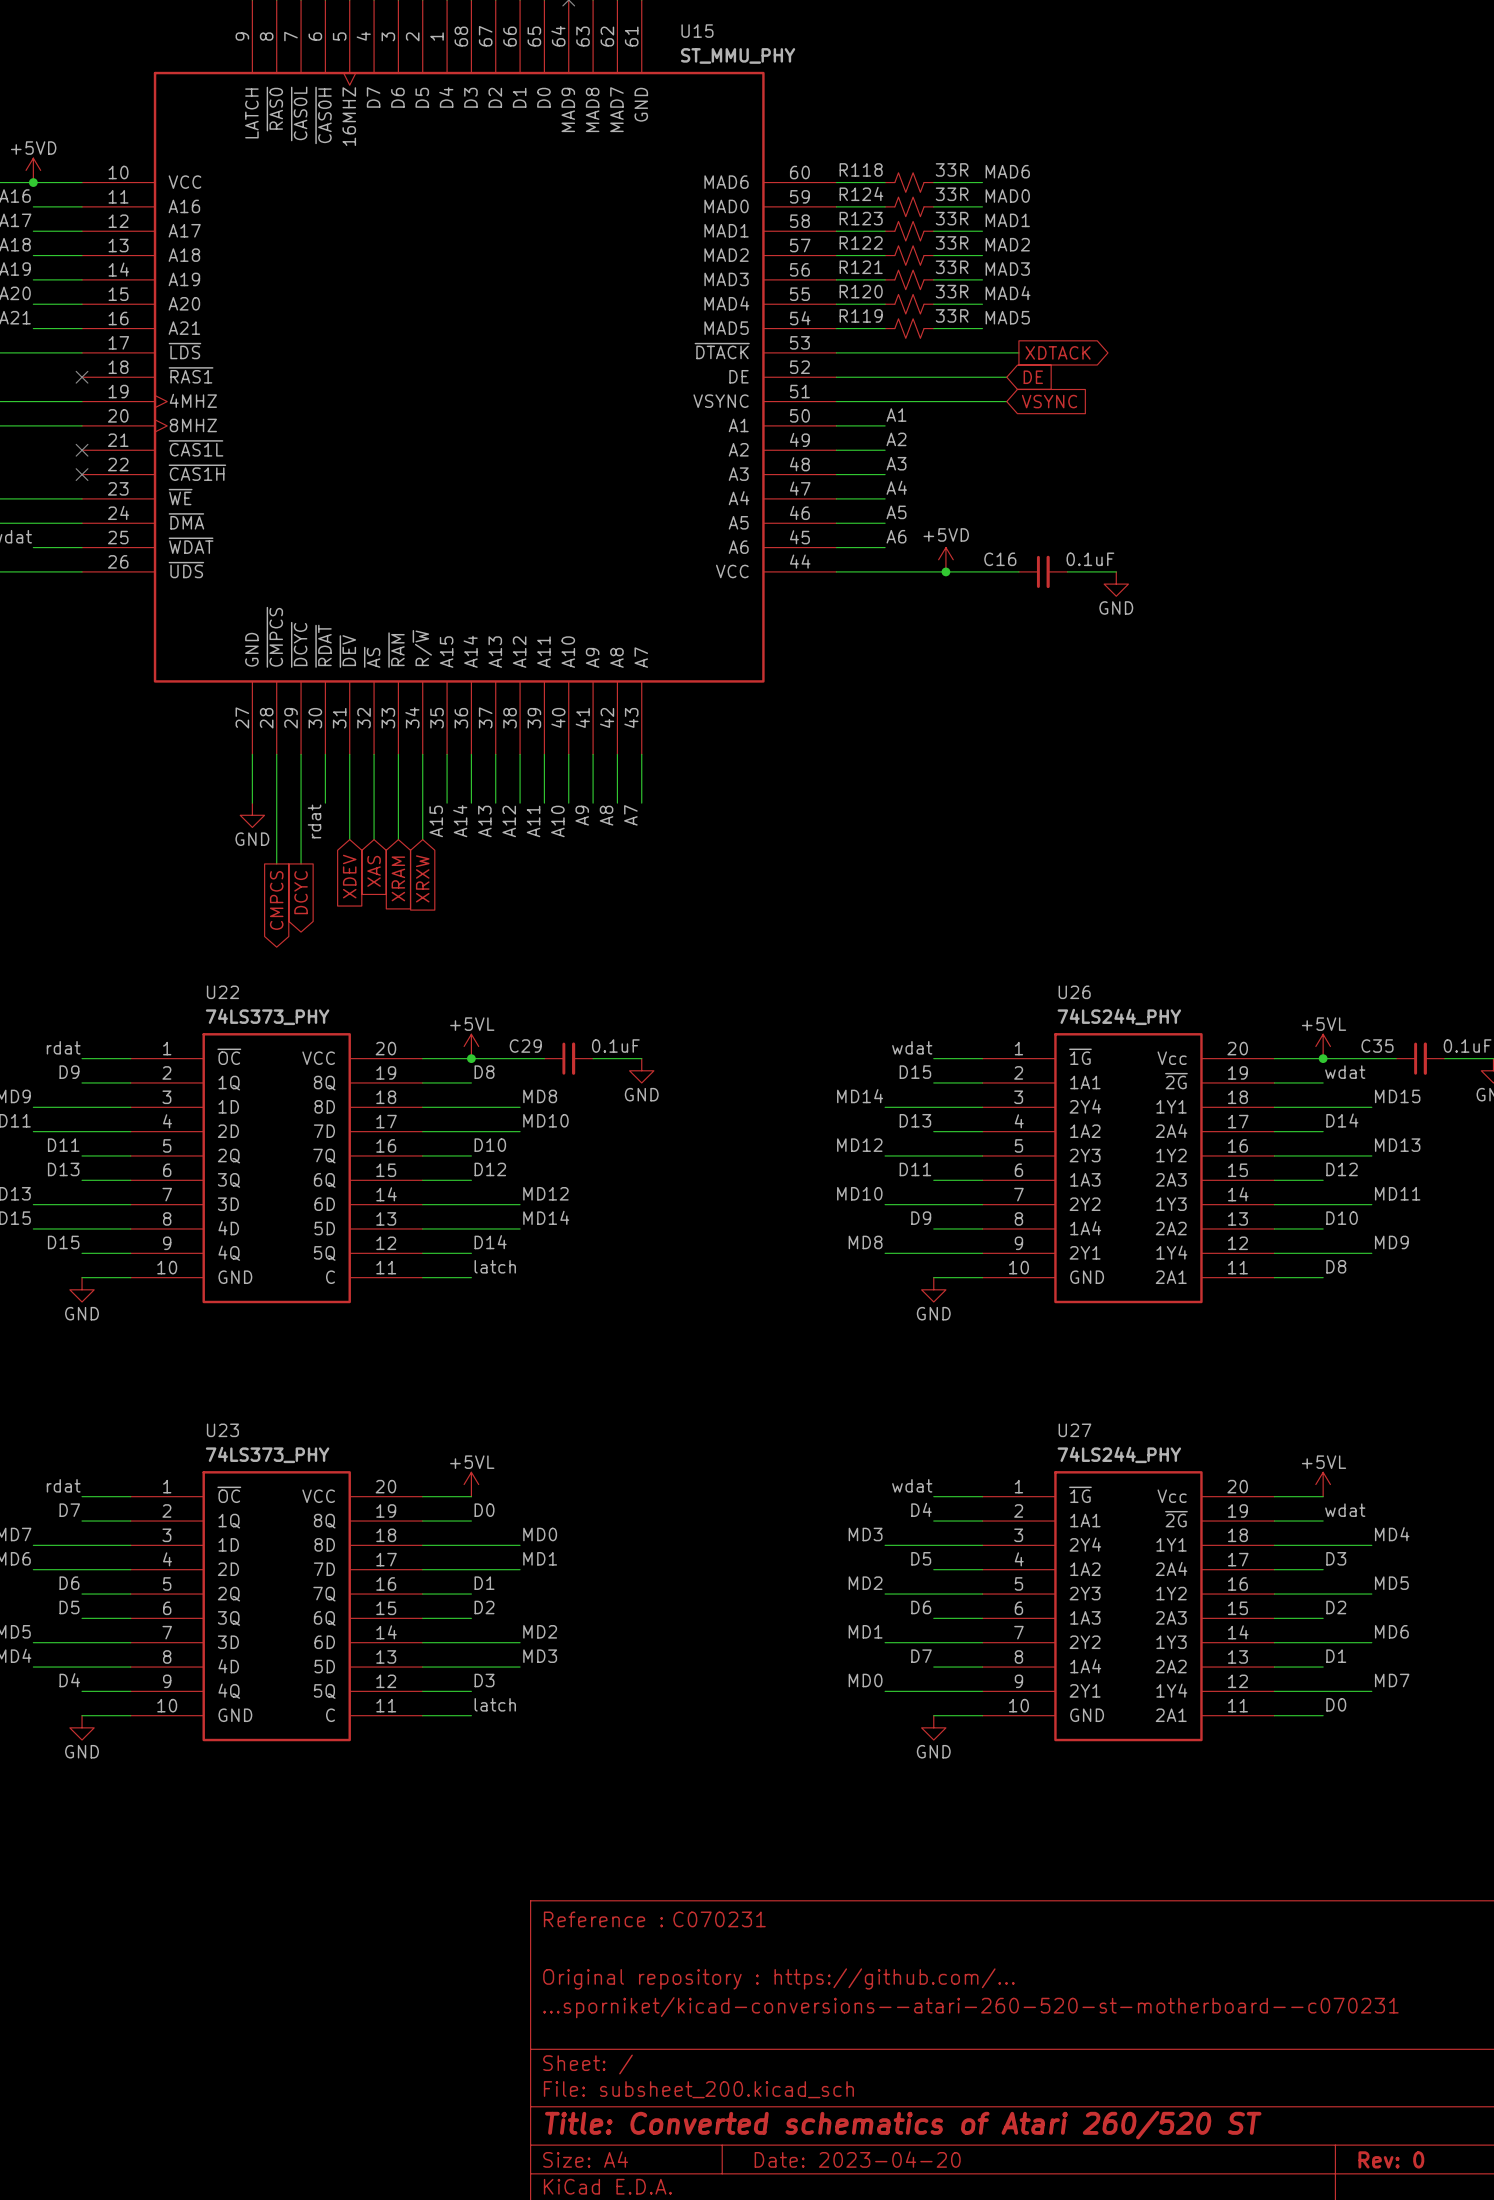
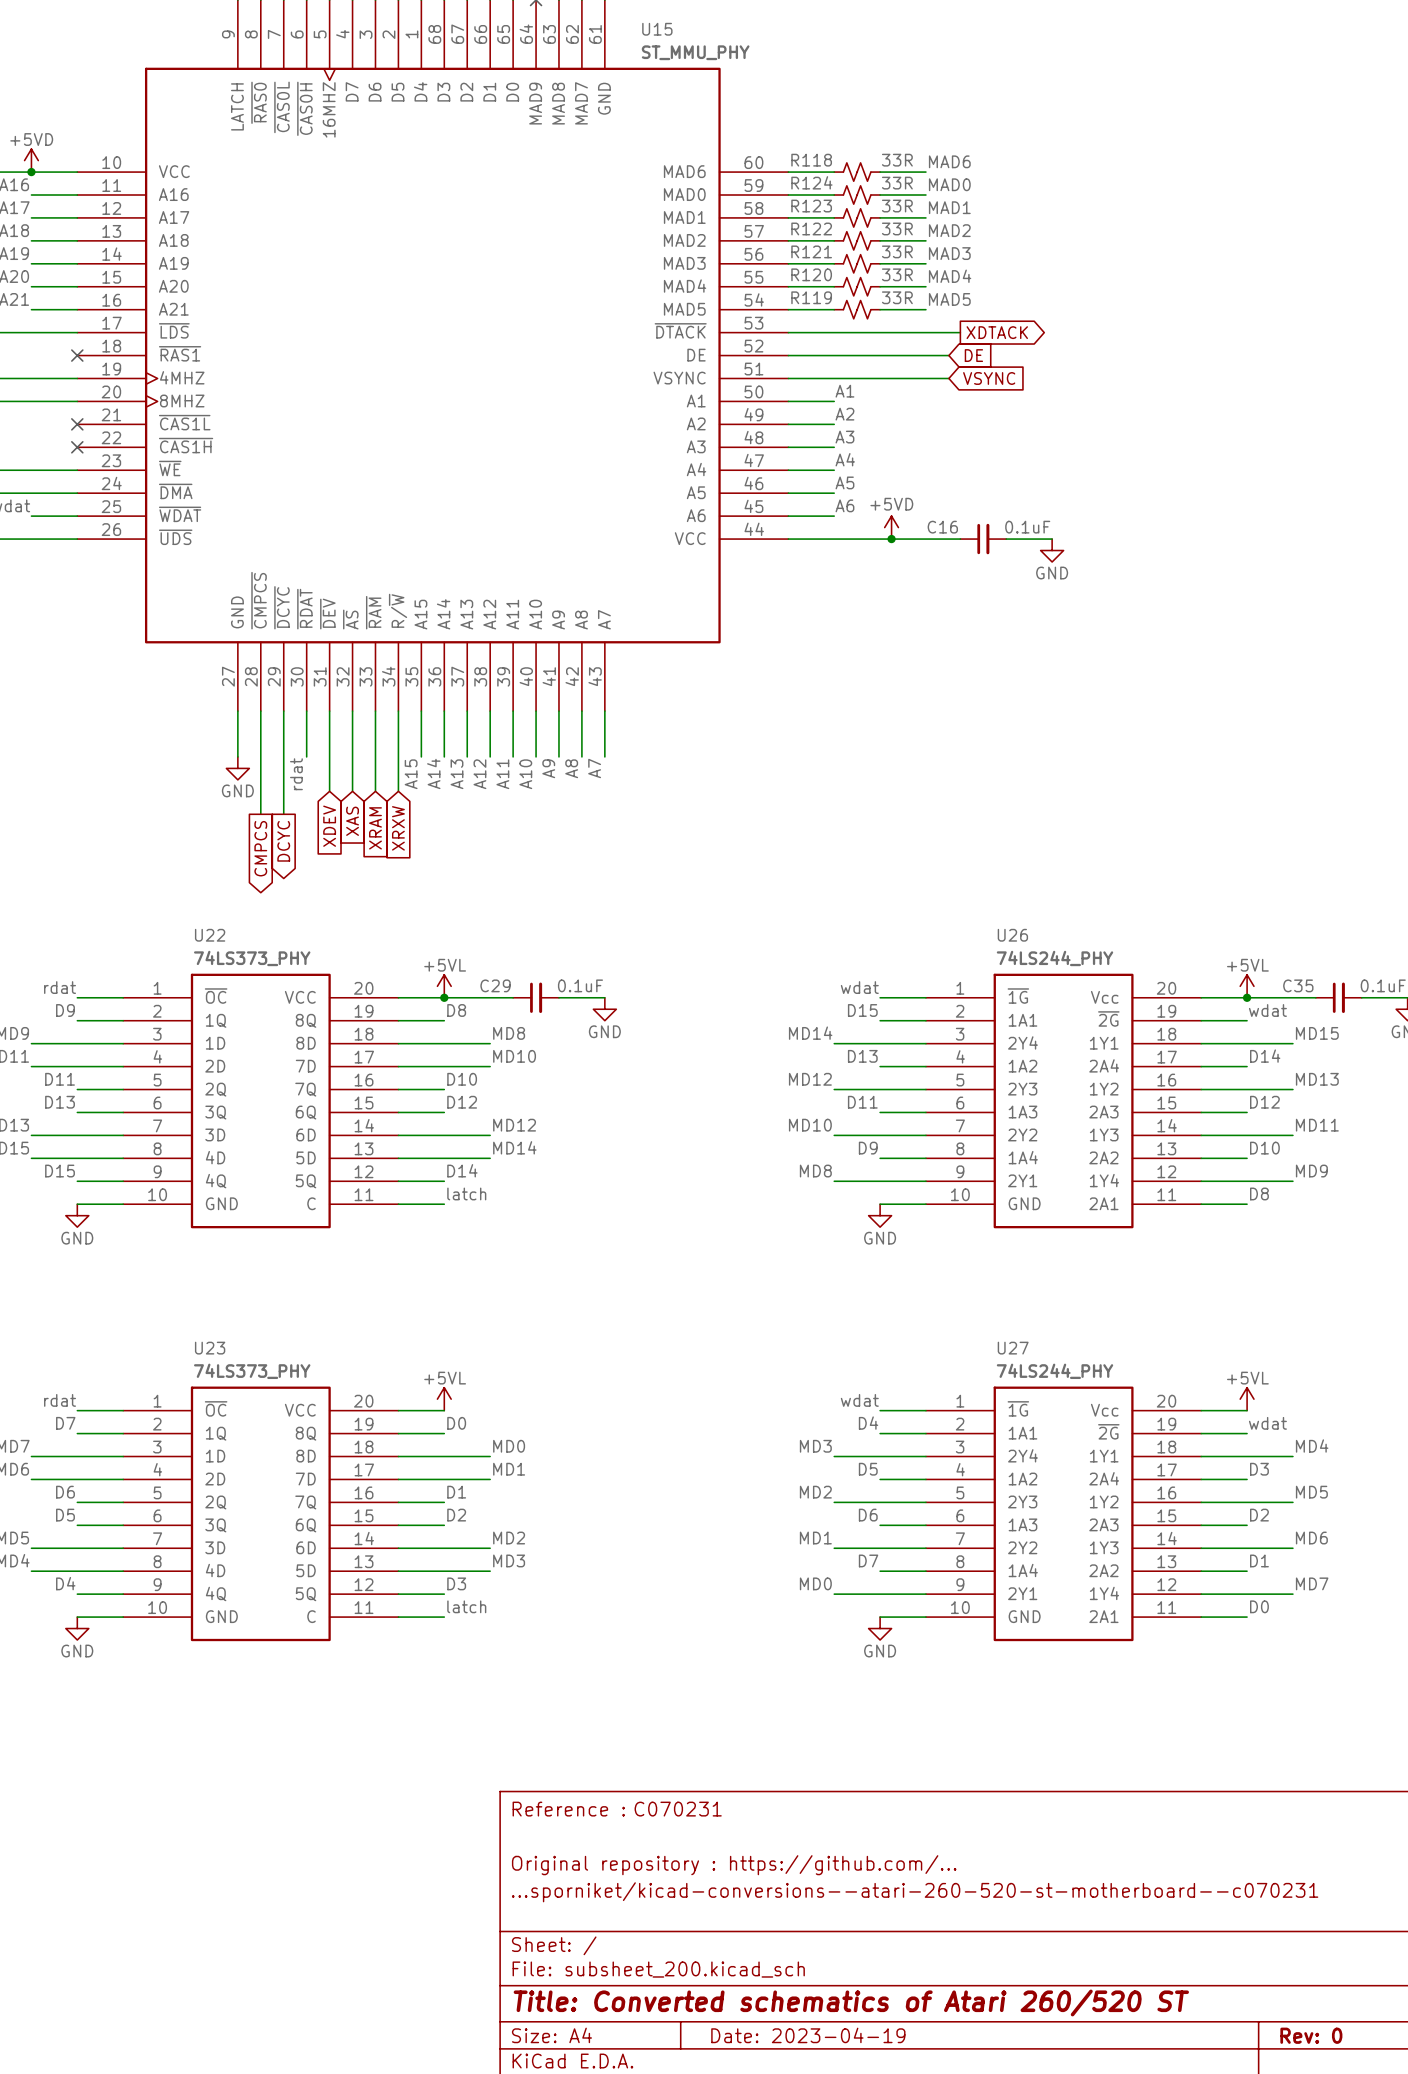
title block: Date: 2023-04-20 (857, 2159) -> Date: 2023-04-19 (808, 2035)

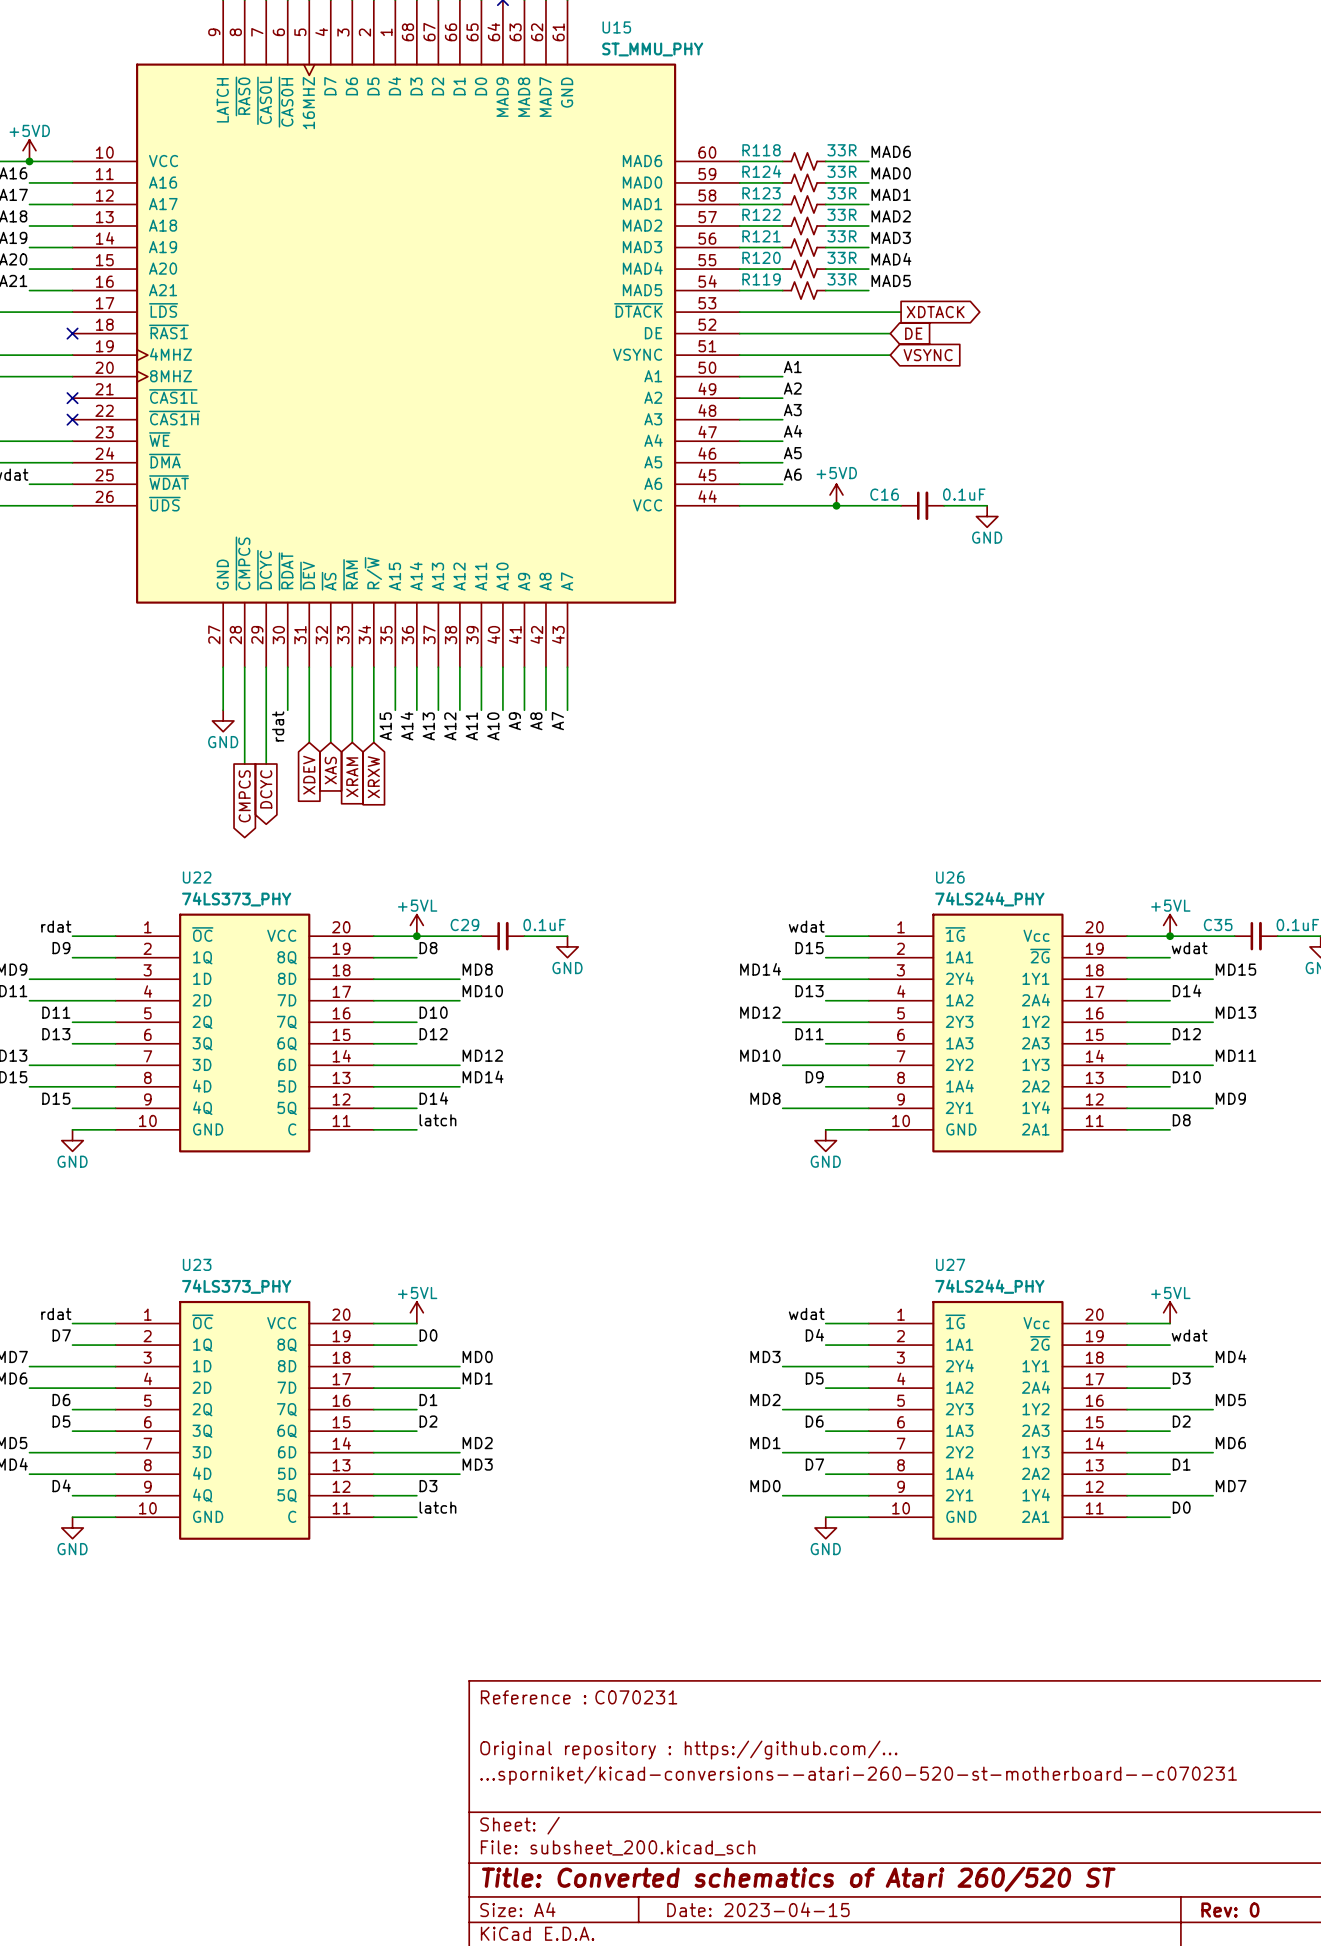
title block: Date: 2023-04-19 (808, 2035) -> Date: 2023-04-15 (758, 1909)

